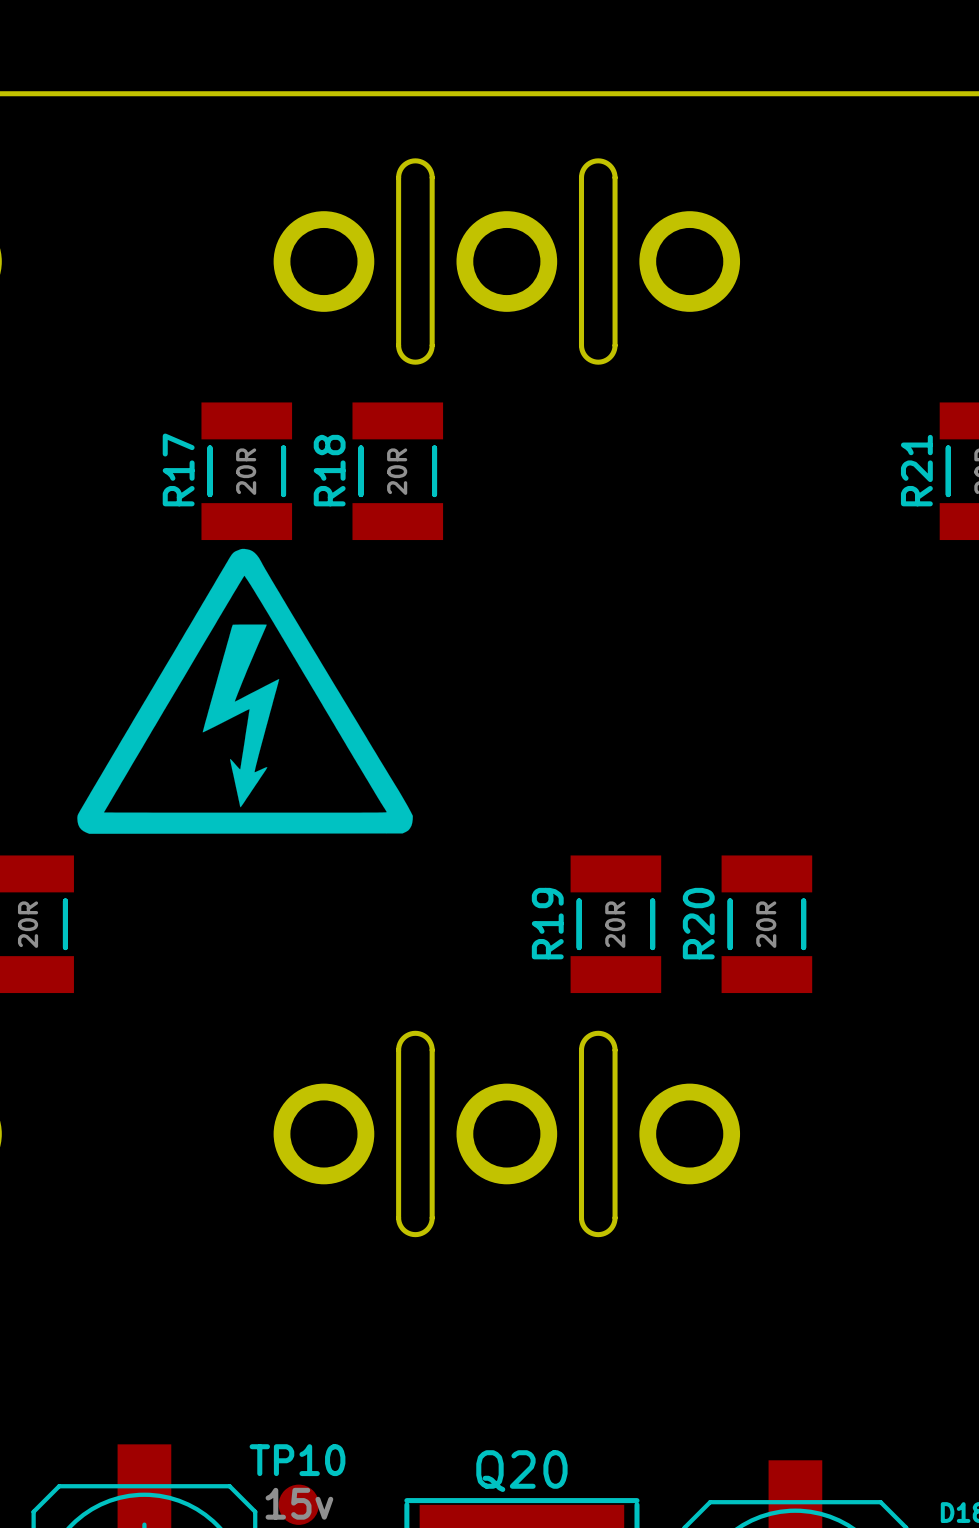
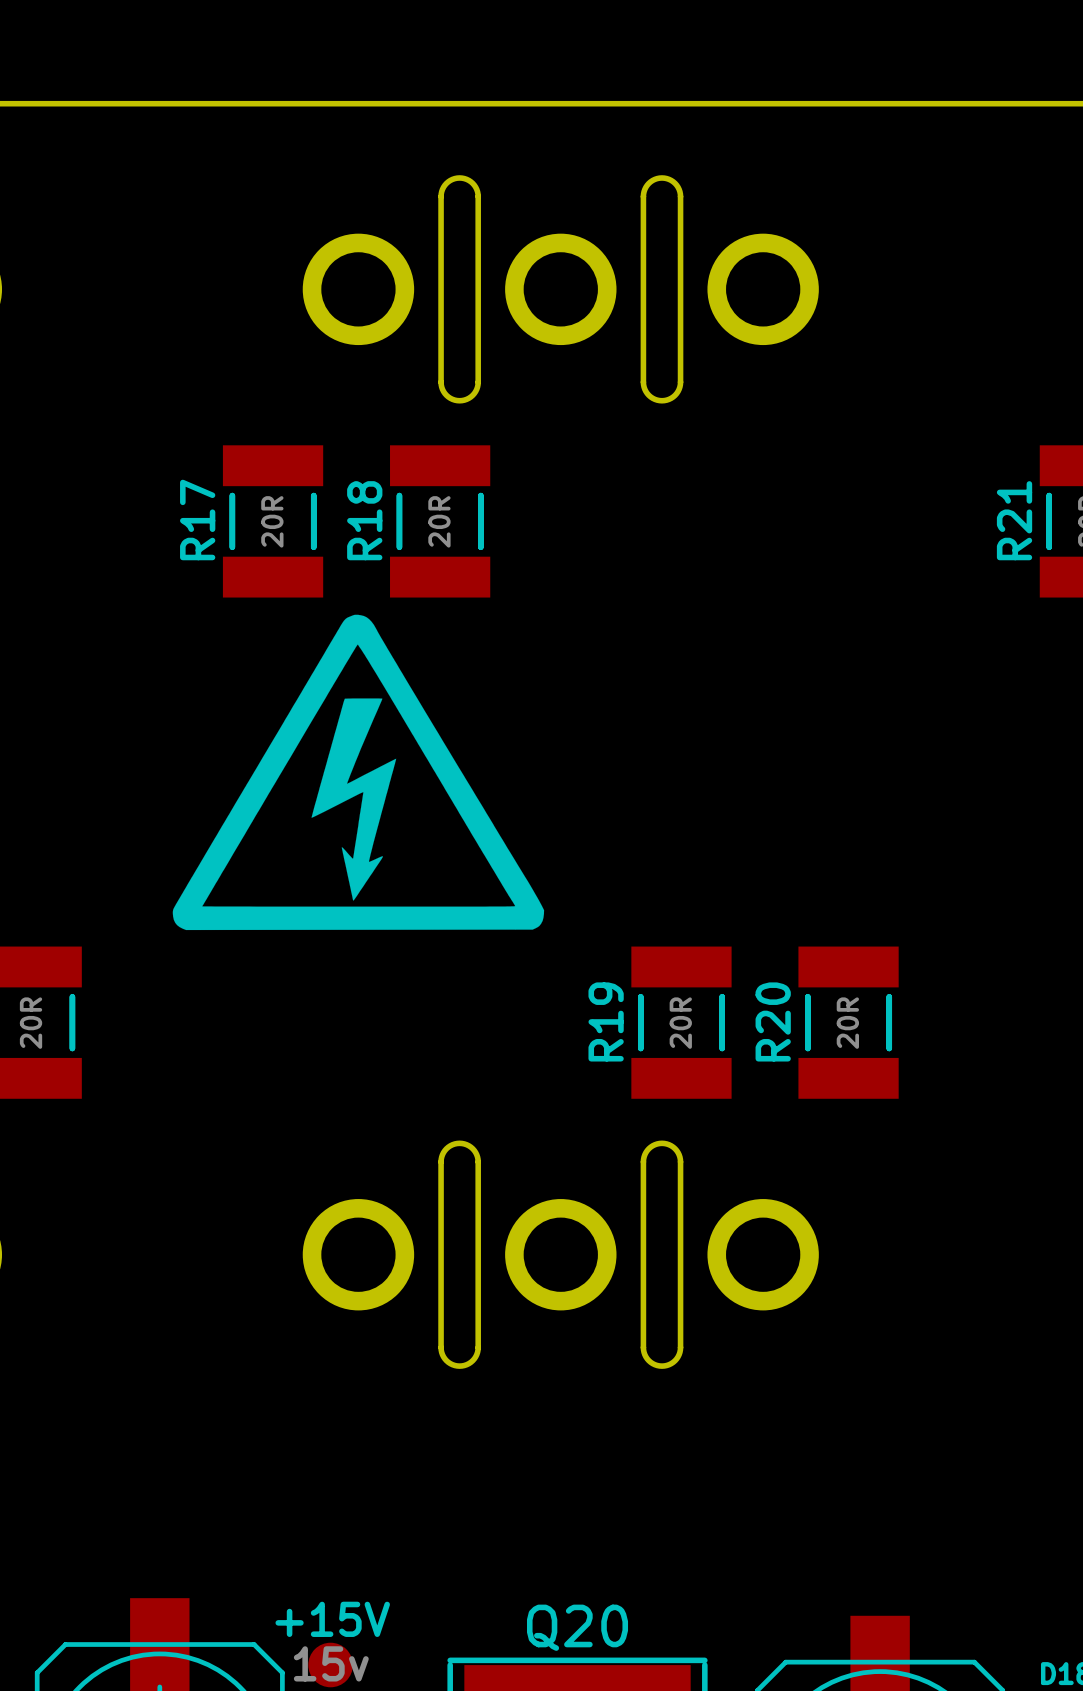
drawing position: (245, 691) -> (358, 772)
TP10 name: TP10 (297, 1460) -> none
text: none -> +15V (332, 1619)

